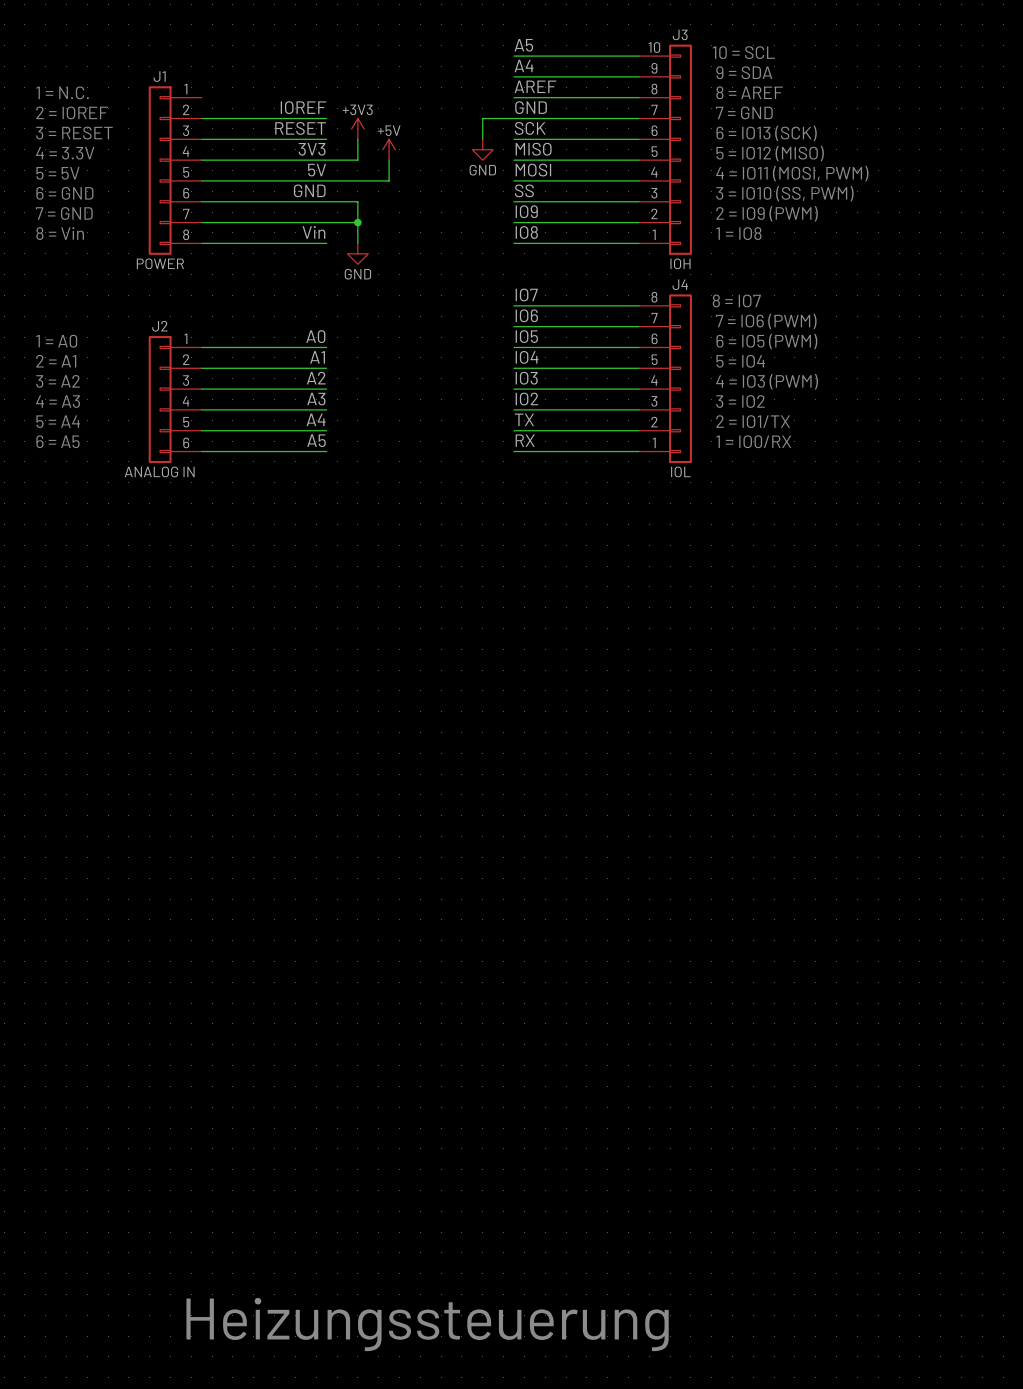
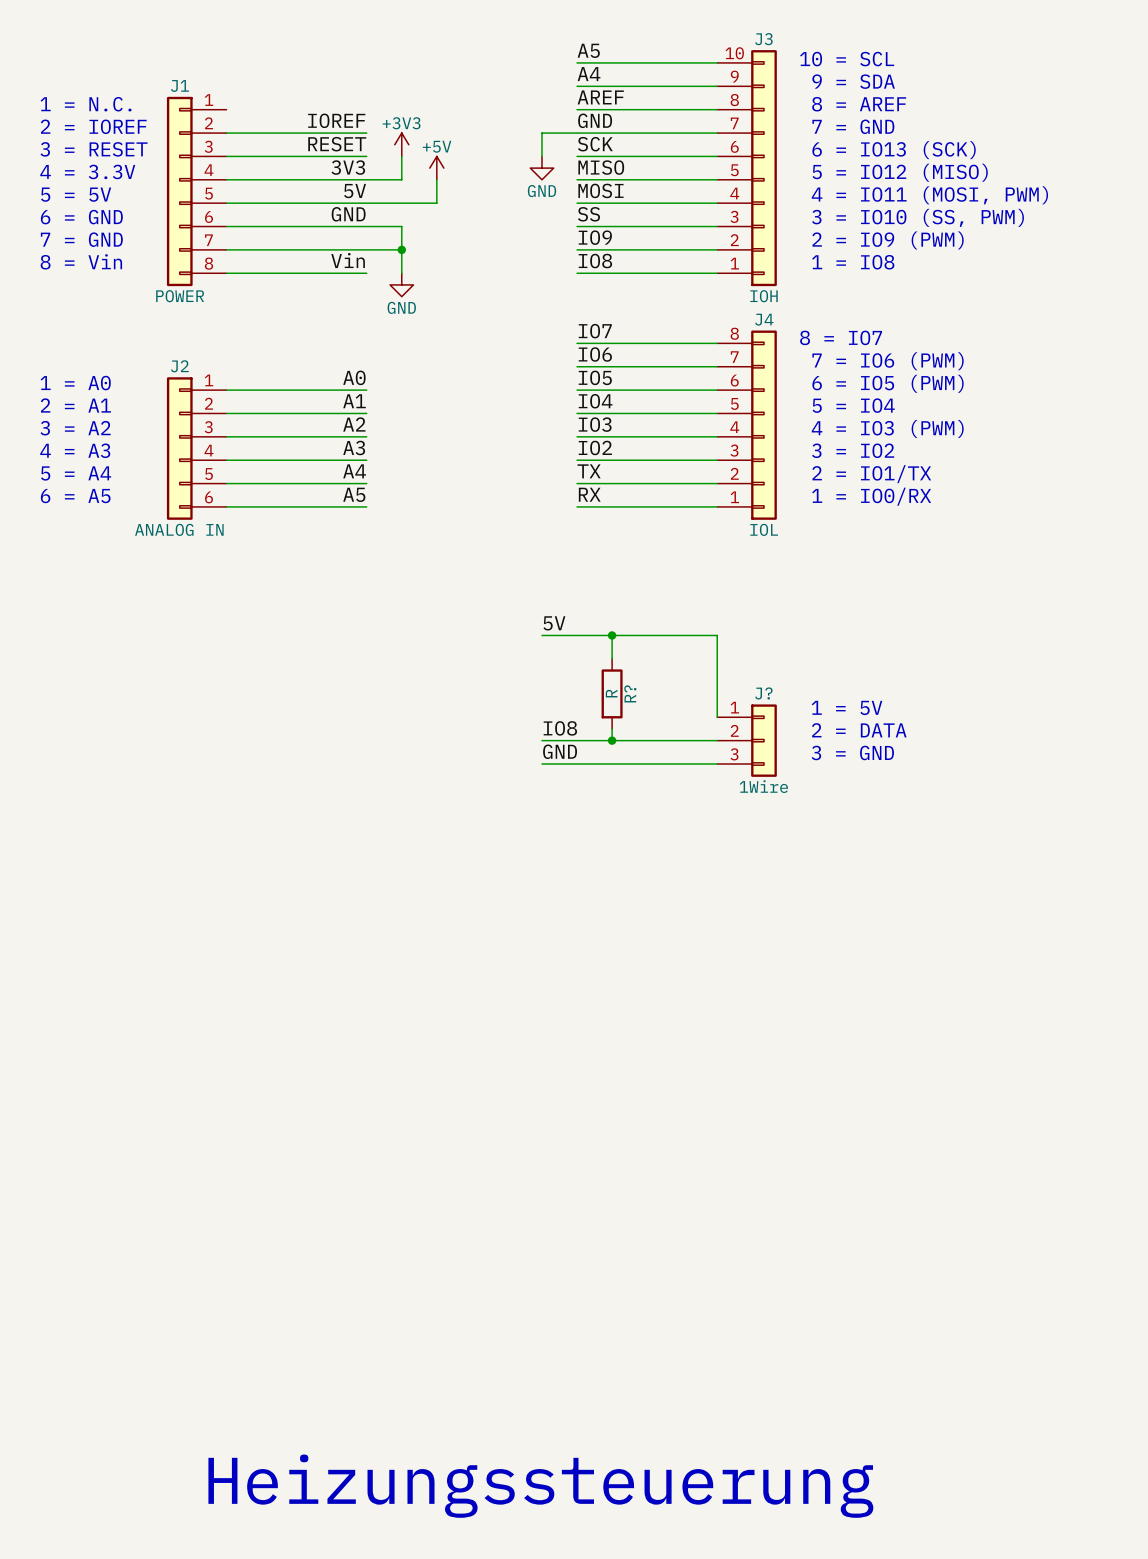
label: none -> 5V (554, 623)
wire: none -> (541, 635) (717, 635) (717, 717)
wire: none -> (612, 635) (612, 658)
junction: none -> (612, 635)
R?: none -> R (612, 693)
text: none -> 1 = 5V (847, 707)
label: none -> IO8 (560, 728)
wire: none -> (612, 728) (612, 740)
text: none -> 2 = DATA (859, 730)
wire: none -> (541, 740) (717, 740)
junction: none -> (612, 740)
J?: none -> 1Wire (747, 740)
label: none -> GND (560, 751)
text: none -> 3 = GND (852, 752)
wire: none -> (541, 764) (717, 764)

